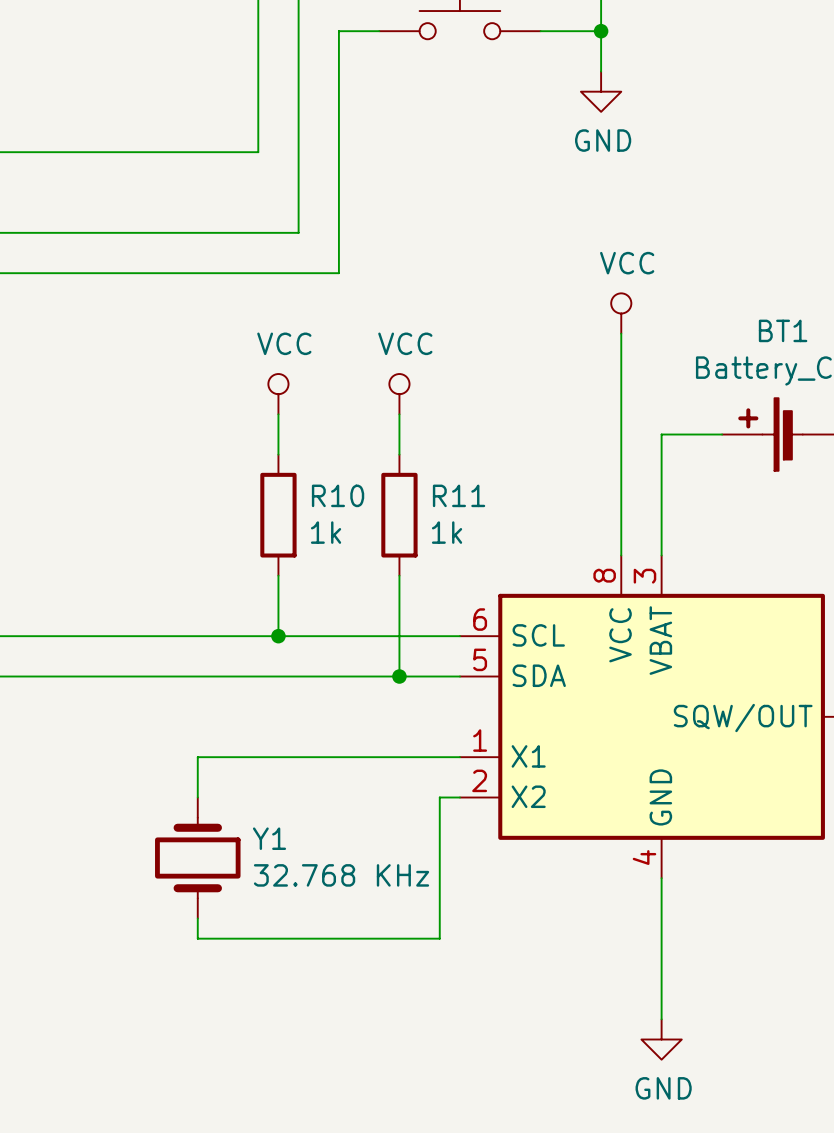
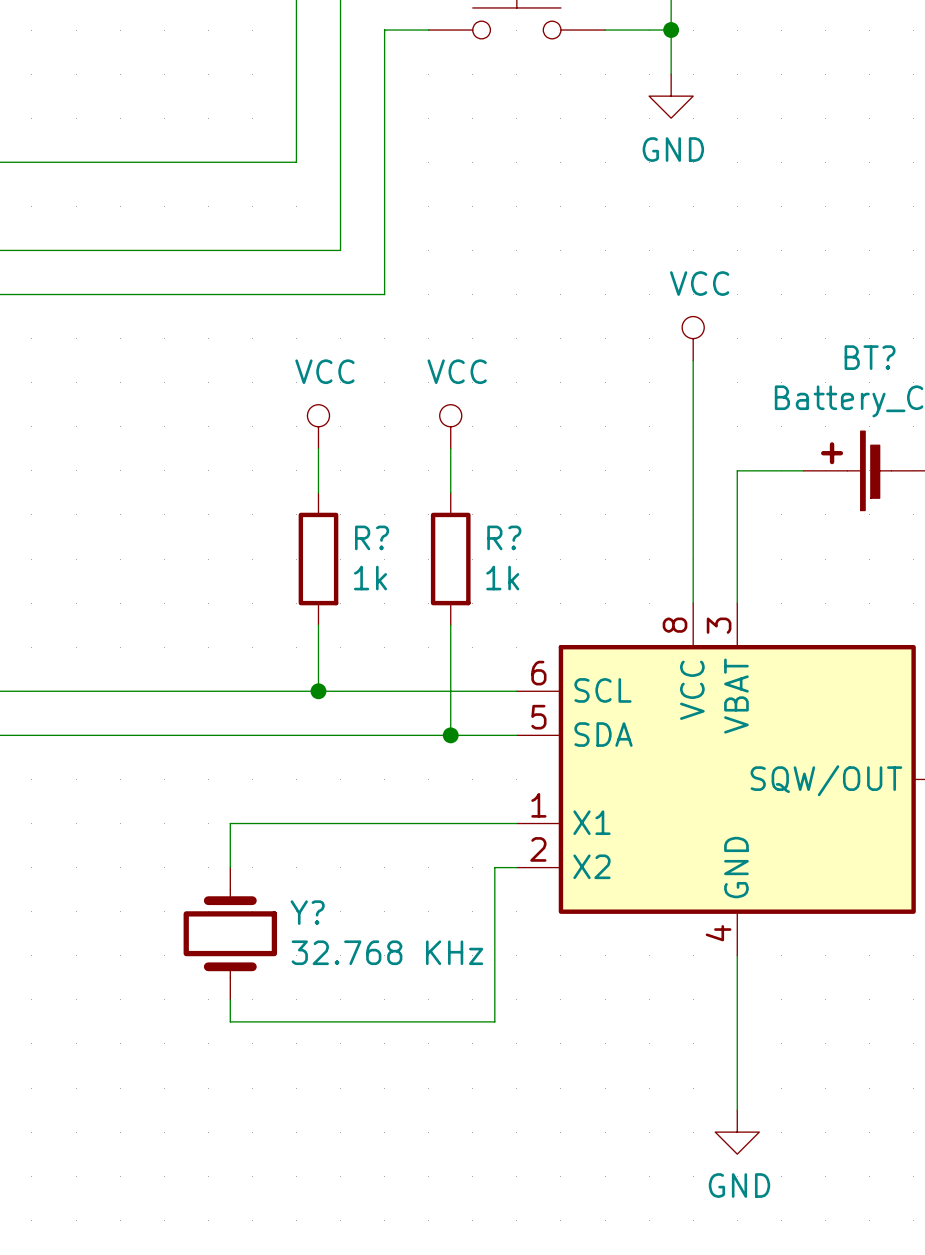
BT1 name: BT1 (783, 330) -> BT? (870, 357)
R10 name: R10 (338, 495) -> R? (372, 537)
R11 name: R11 (459, 495) -> R? (504, 537)
Y1 name: Y1 (269, 838) -> Y? (307, 912)

